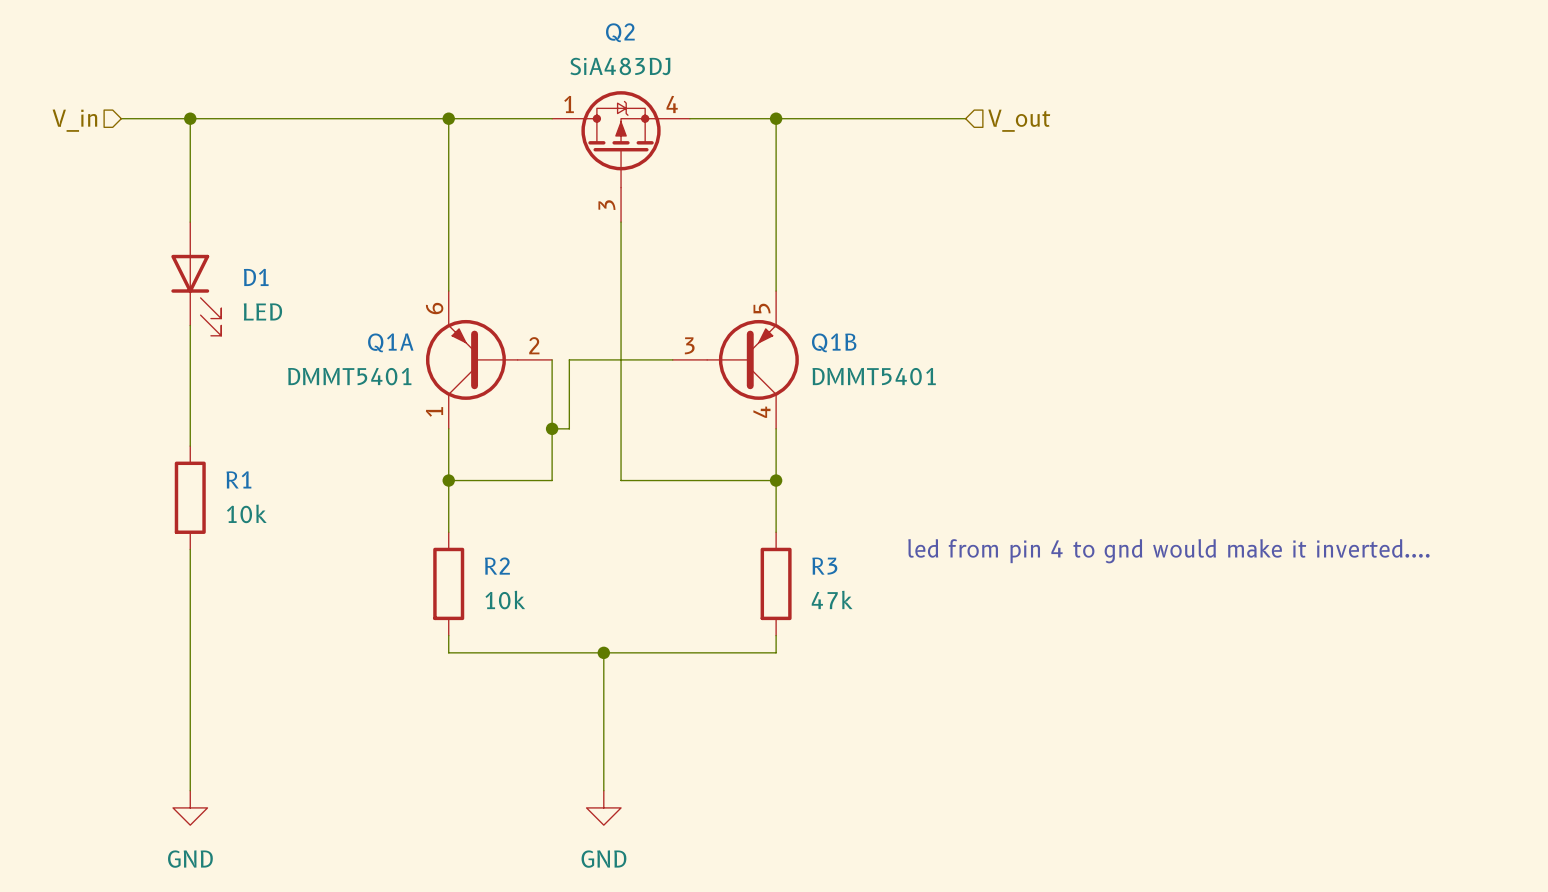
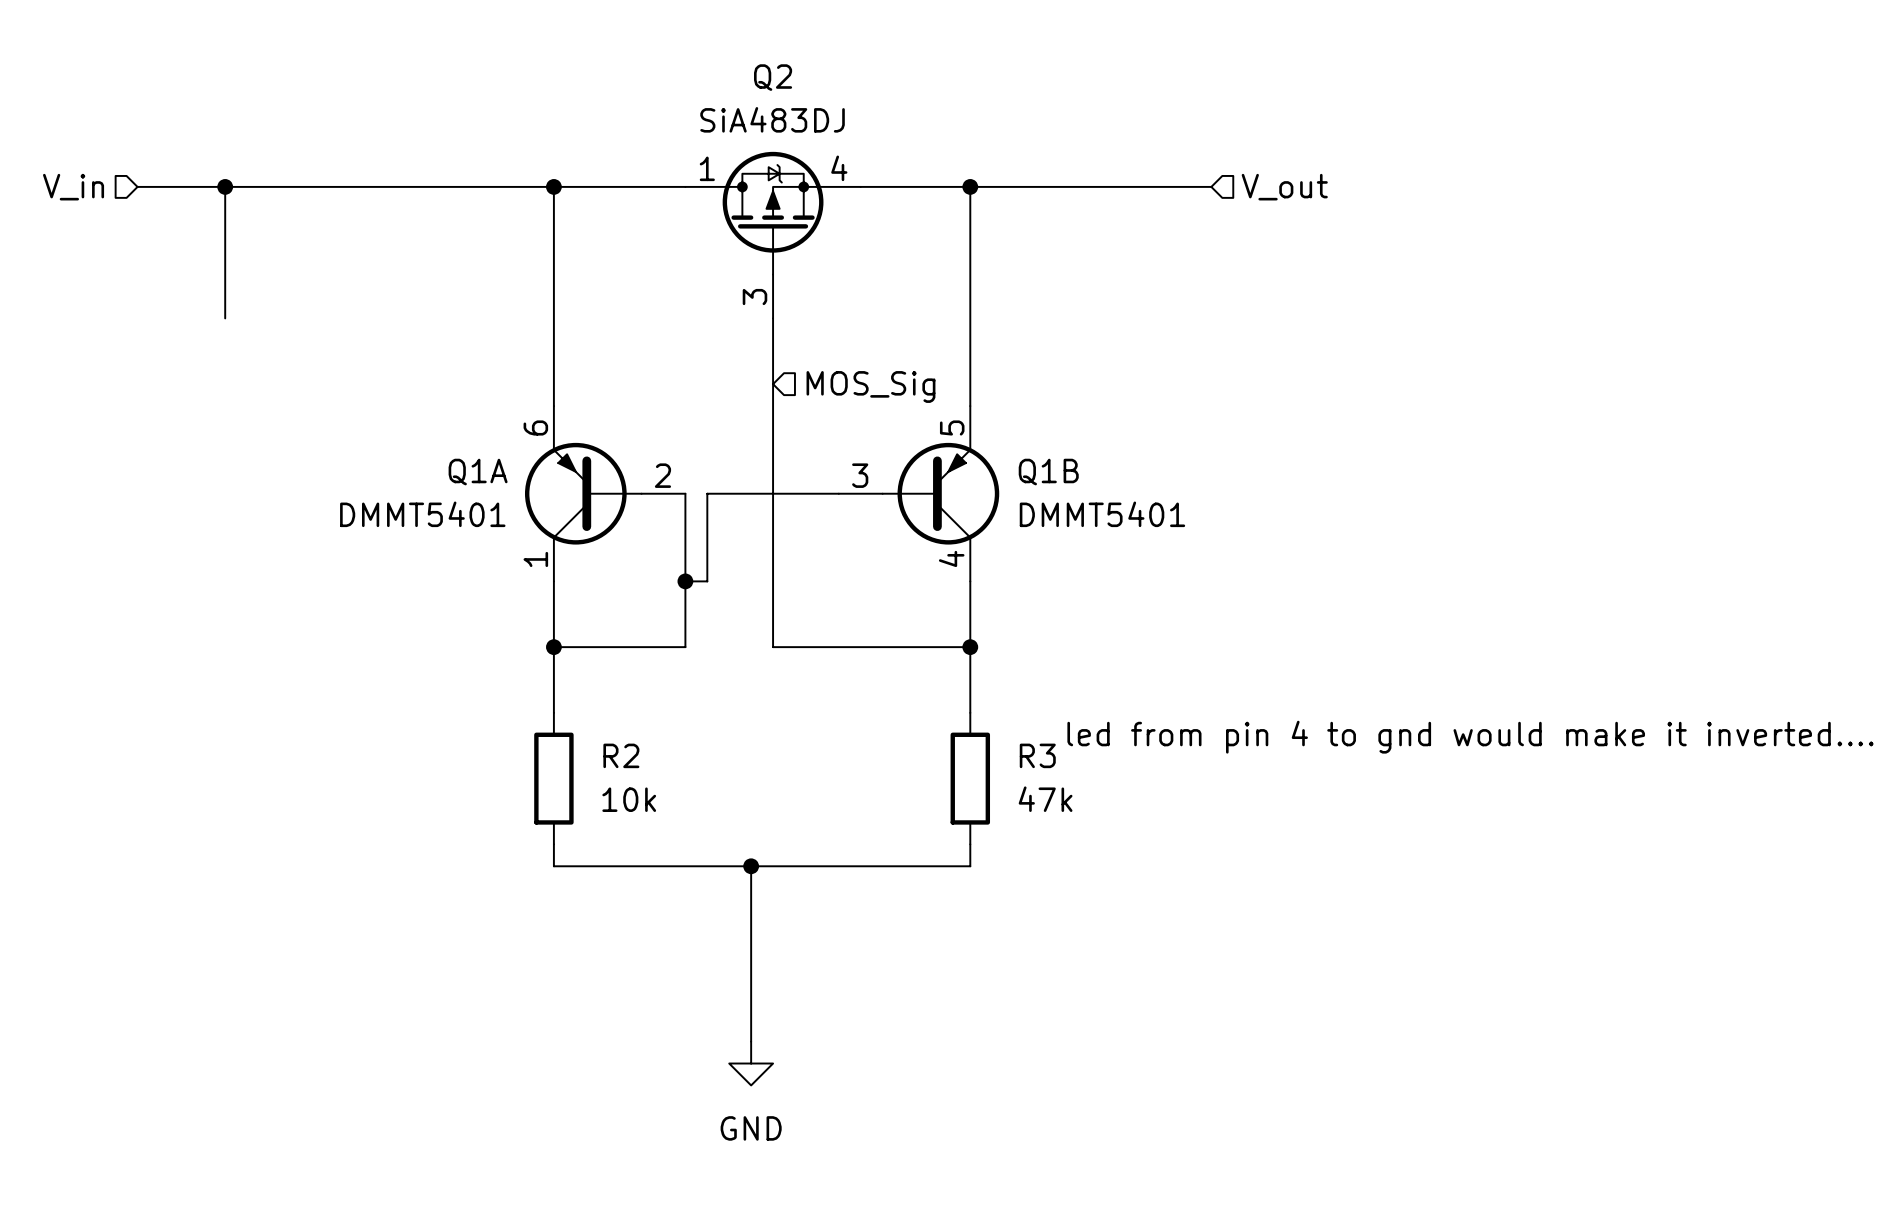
hierarchical label: none -> MOS_Sig (870, 386)
D1: LED (196, 278) -> none
wire: (190, 325) (190, 446) -> none
R1: 10k (190, 497) -> none
wire: (190, 549) (190, 790) -> none
power symbol: GND (190, 807) -> none

